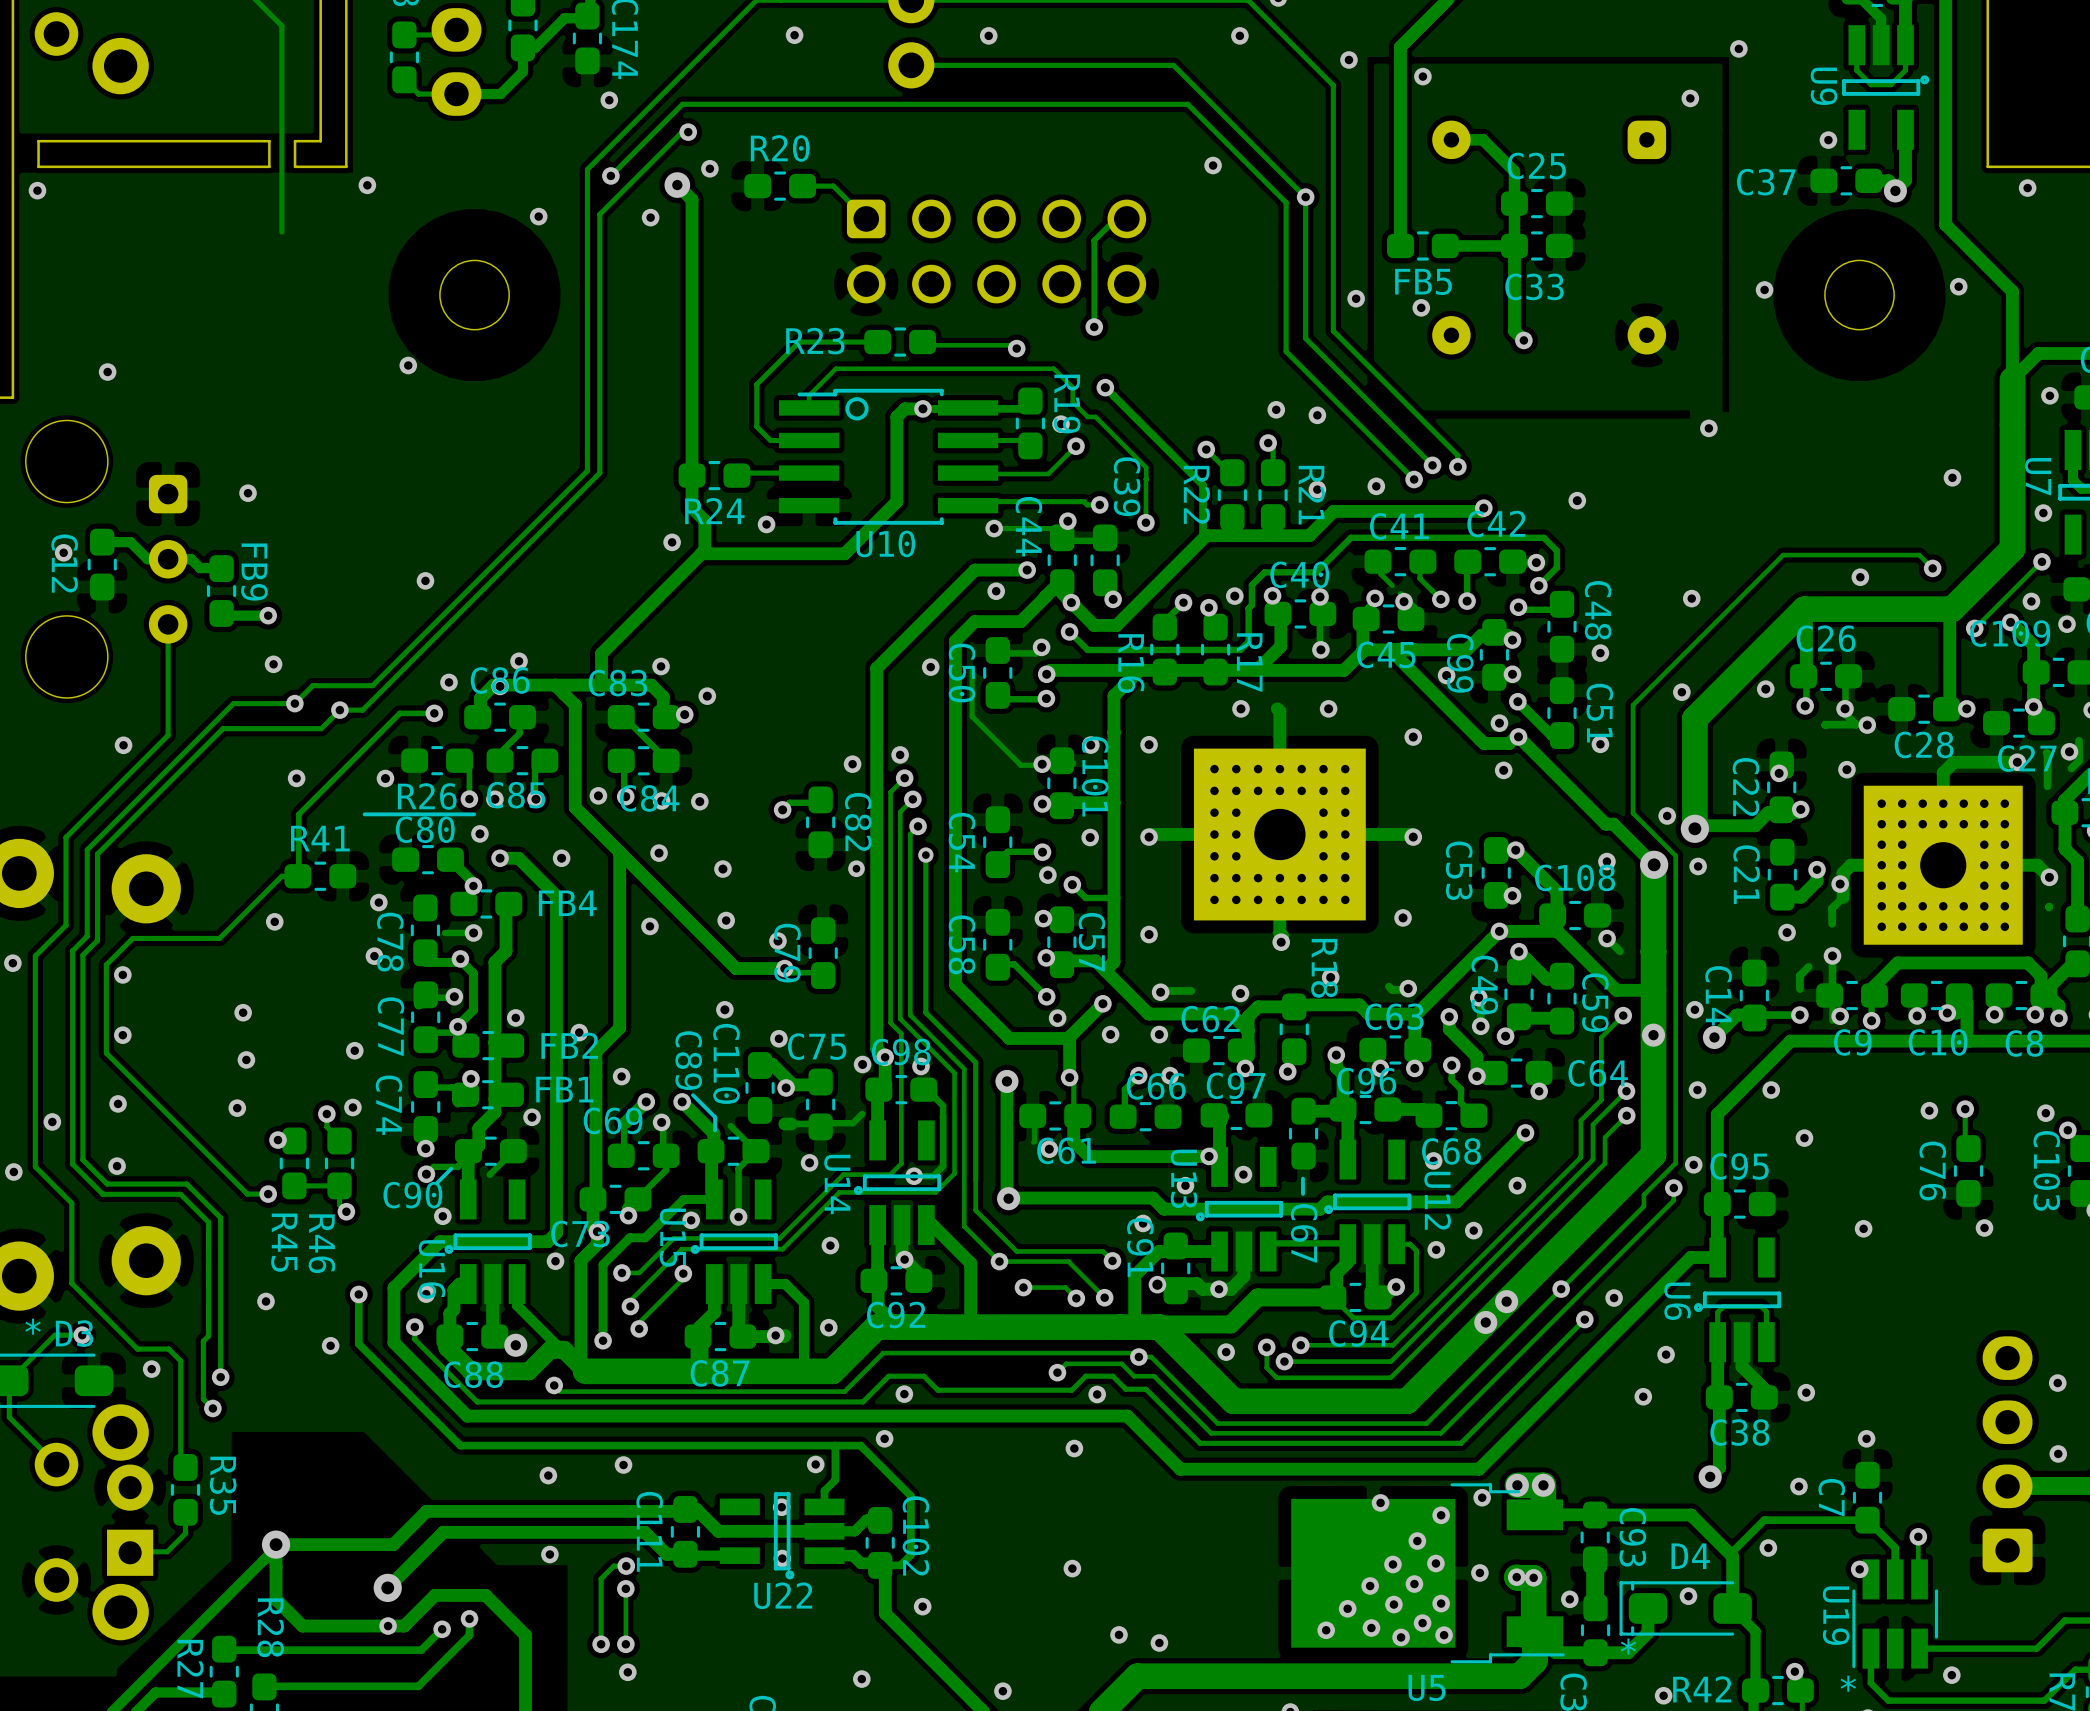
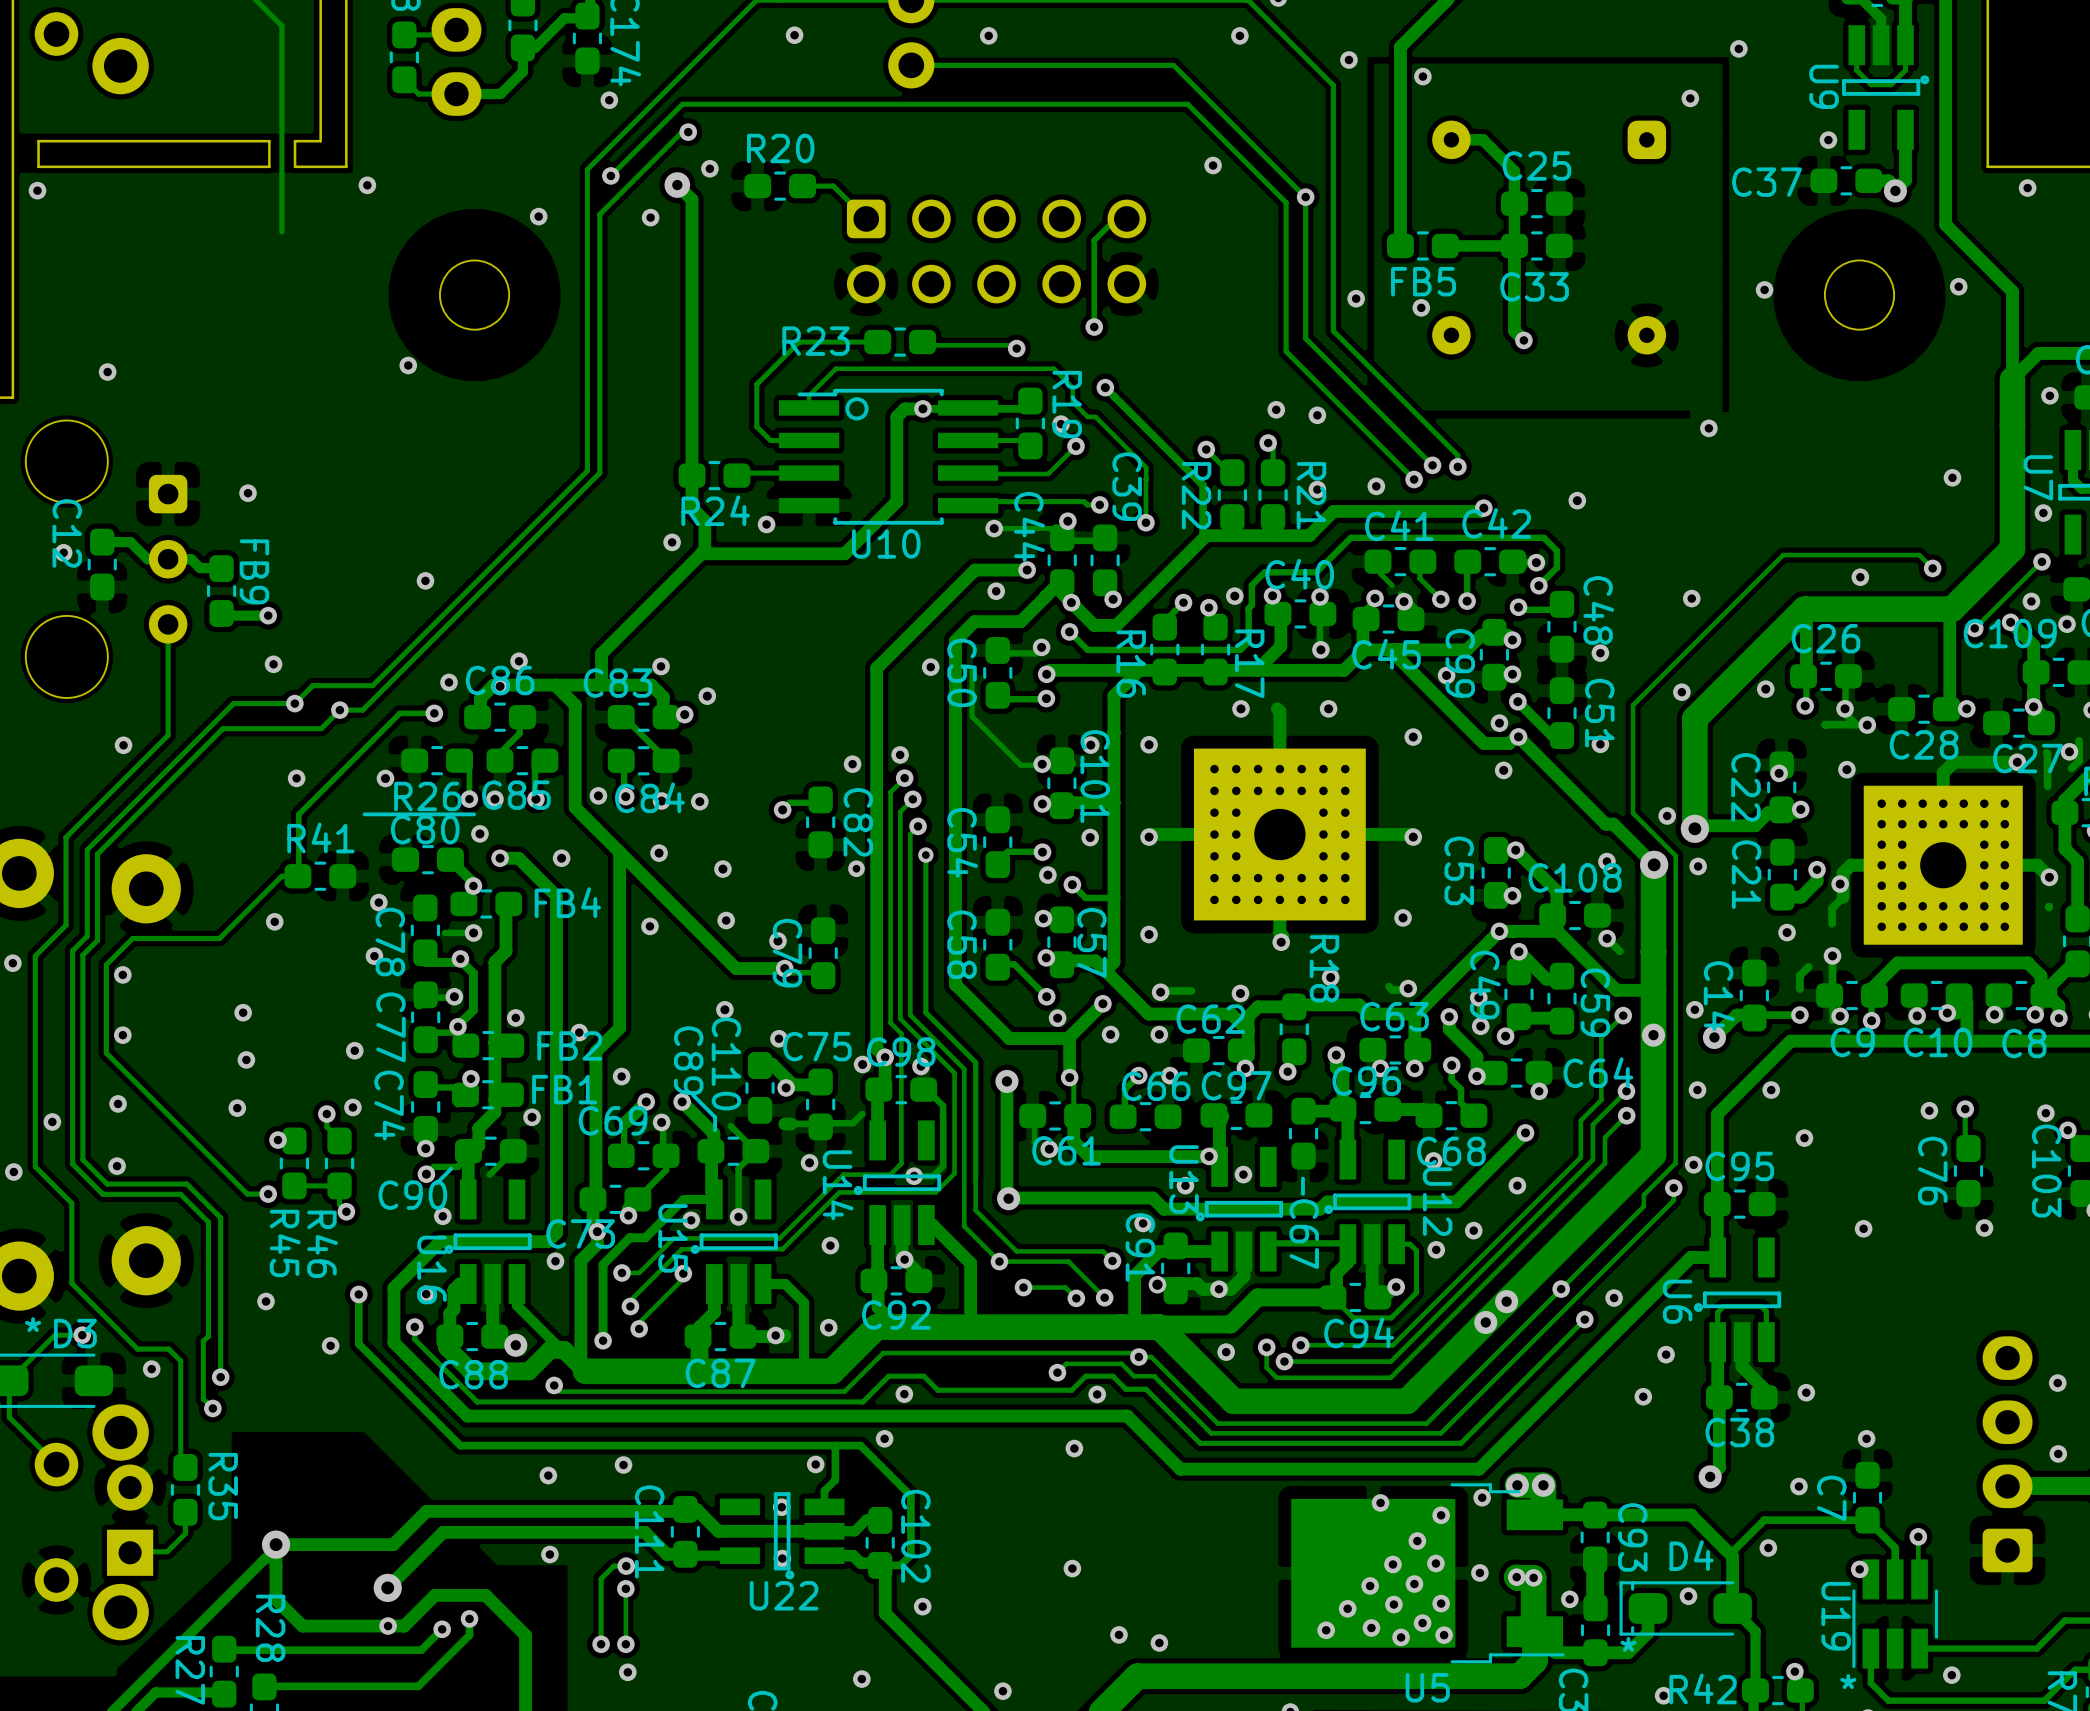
C12 name position: C12 (64, 563) -> C12 (67, 533)

